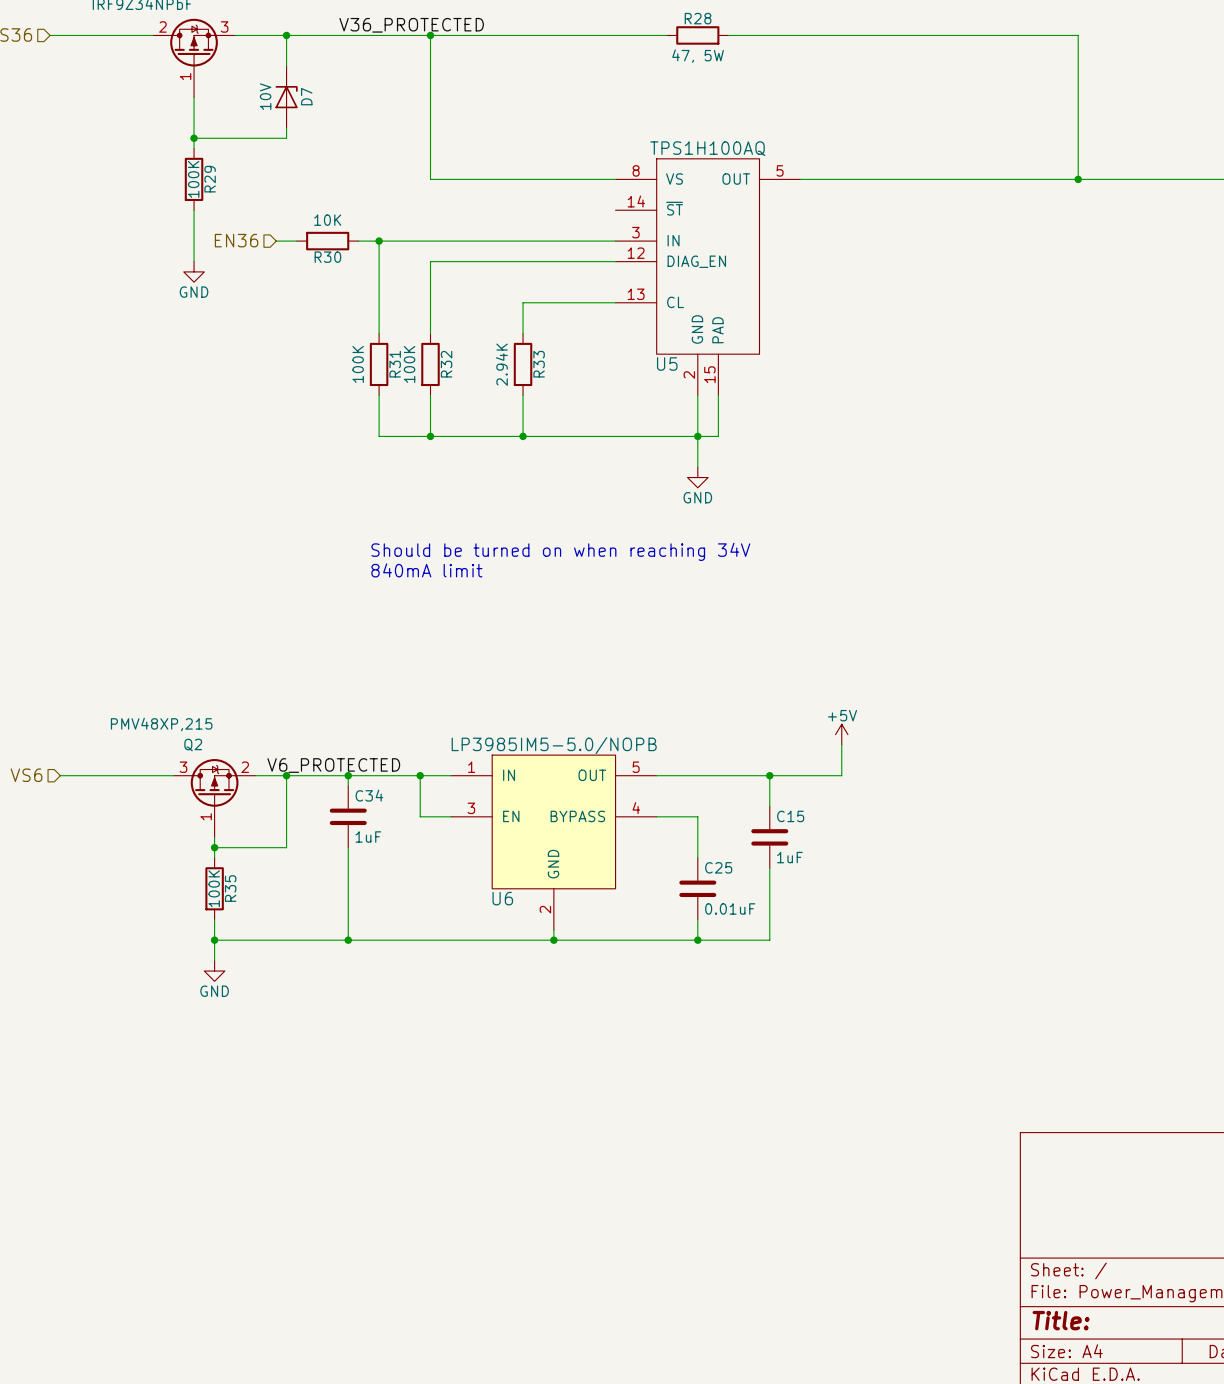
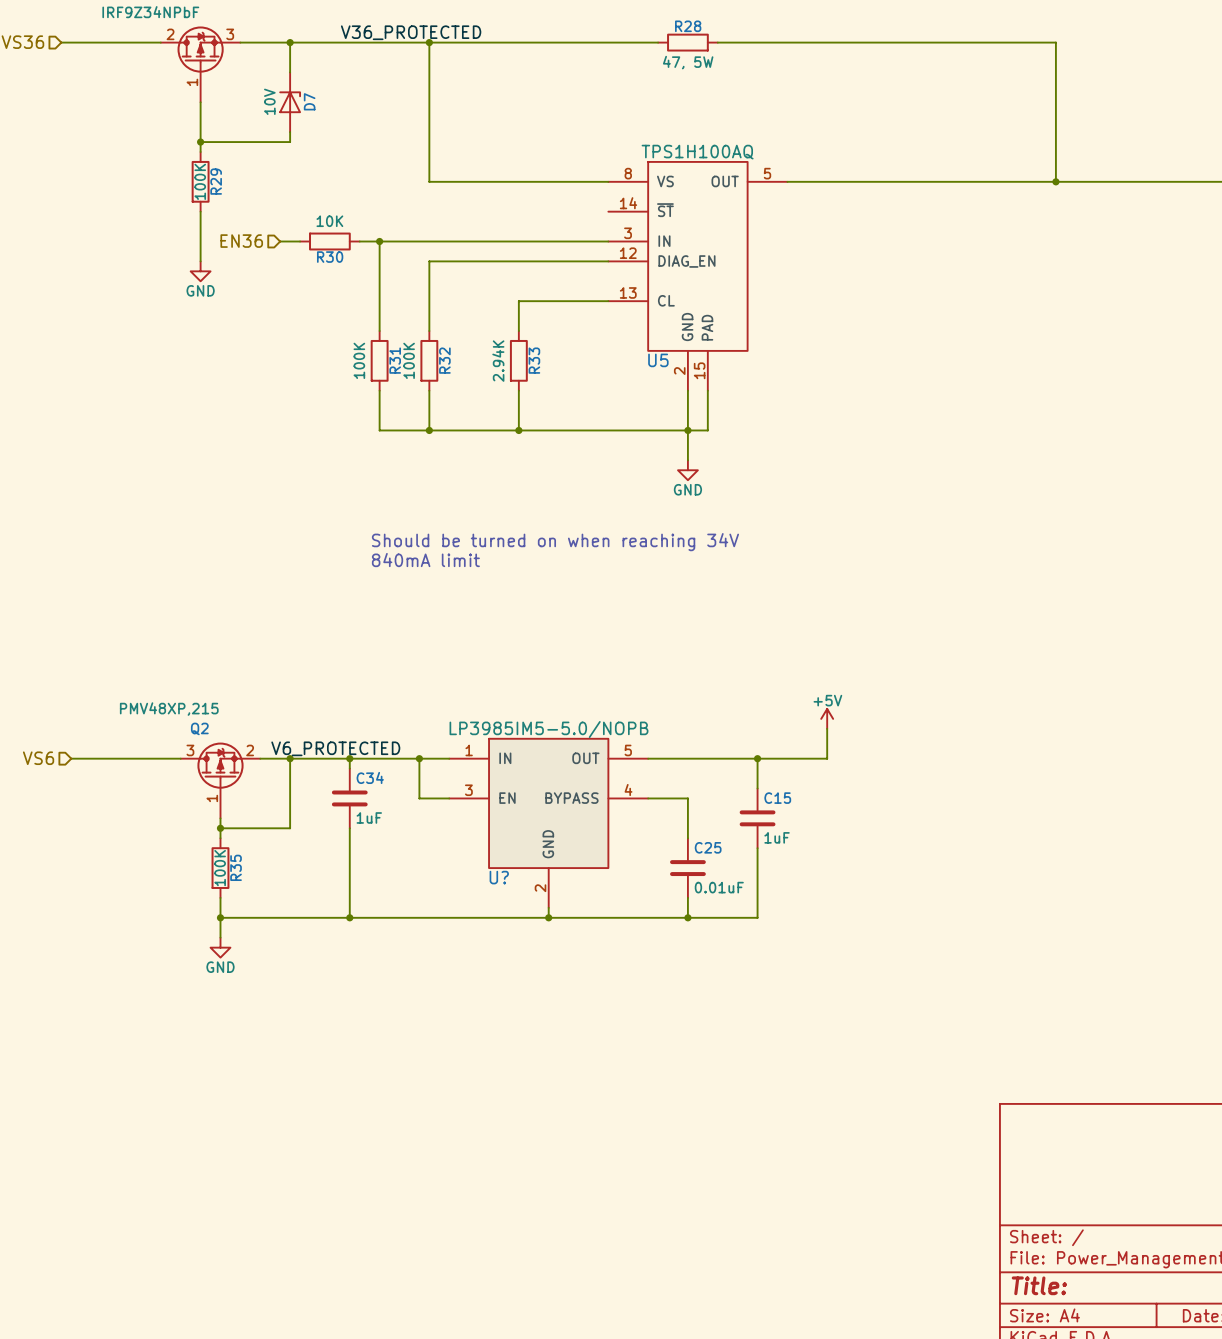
U6 name: U6 (502, 898) -> U? (499, 877)

